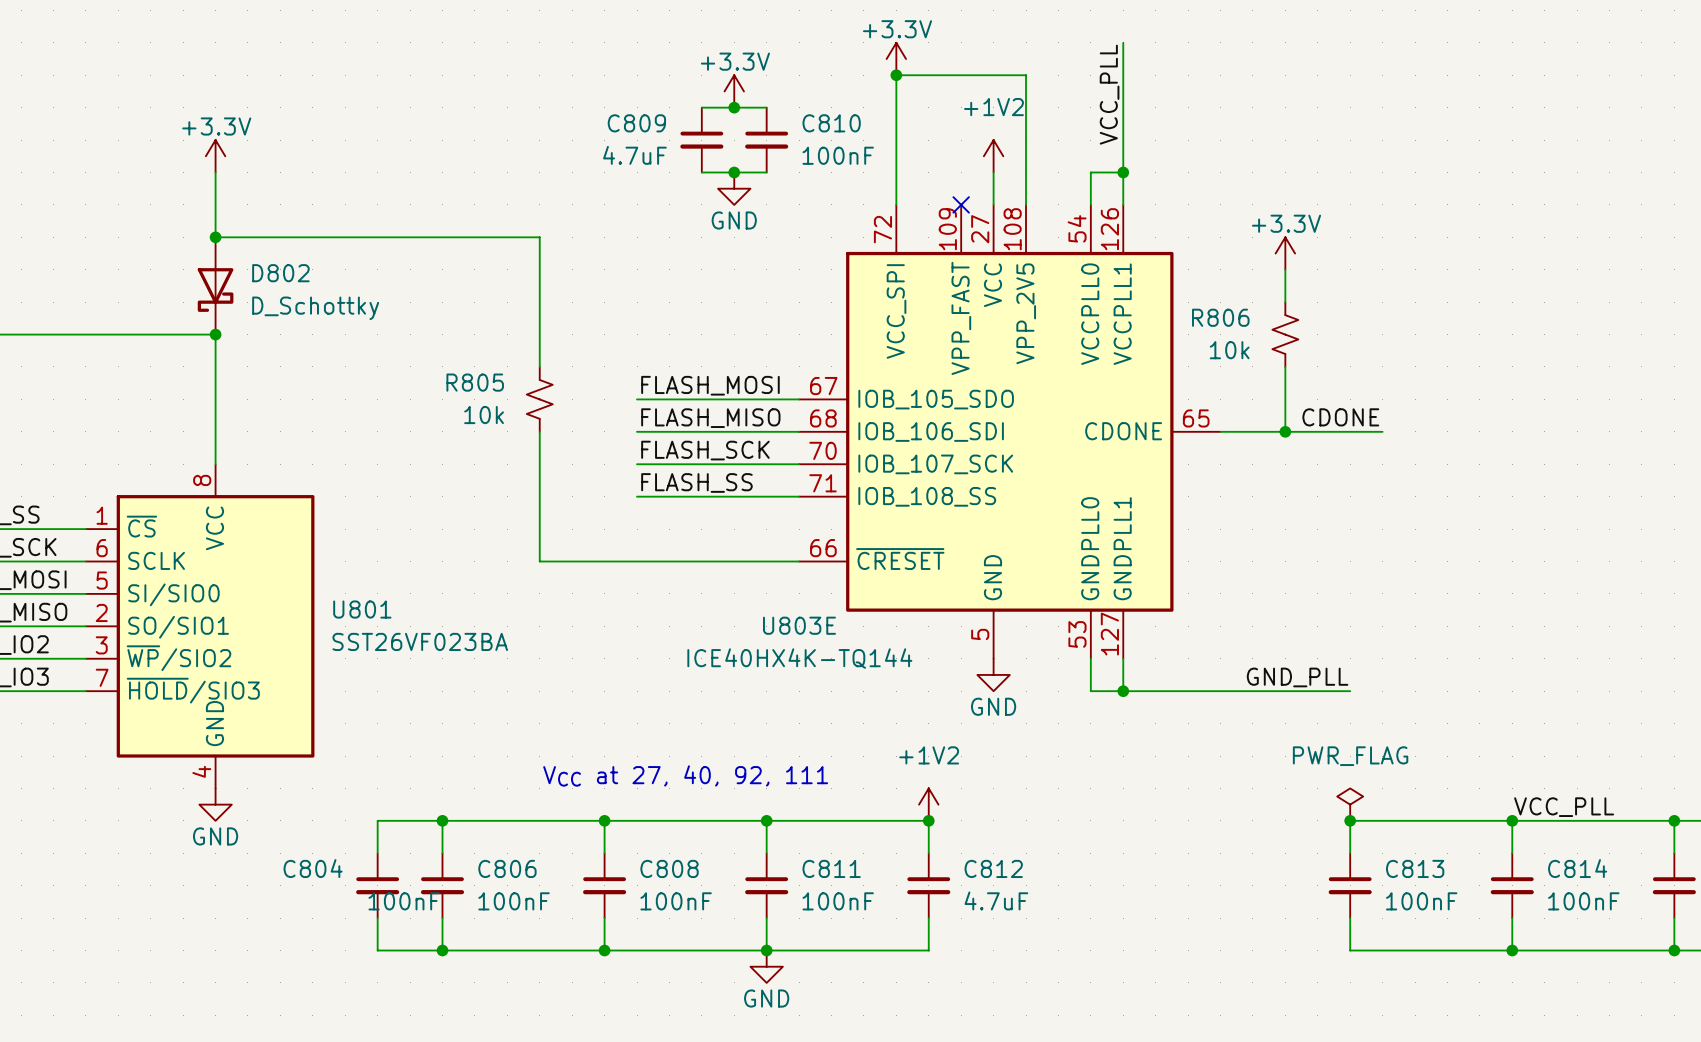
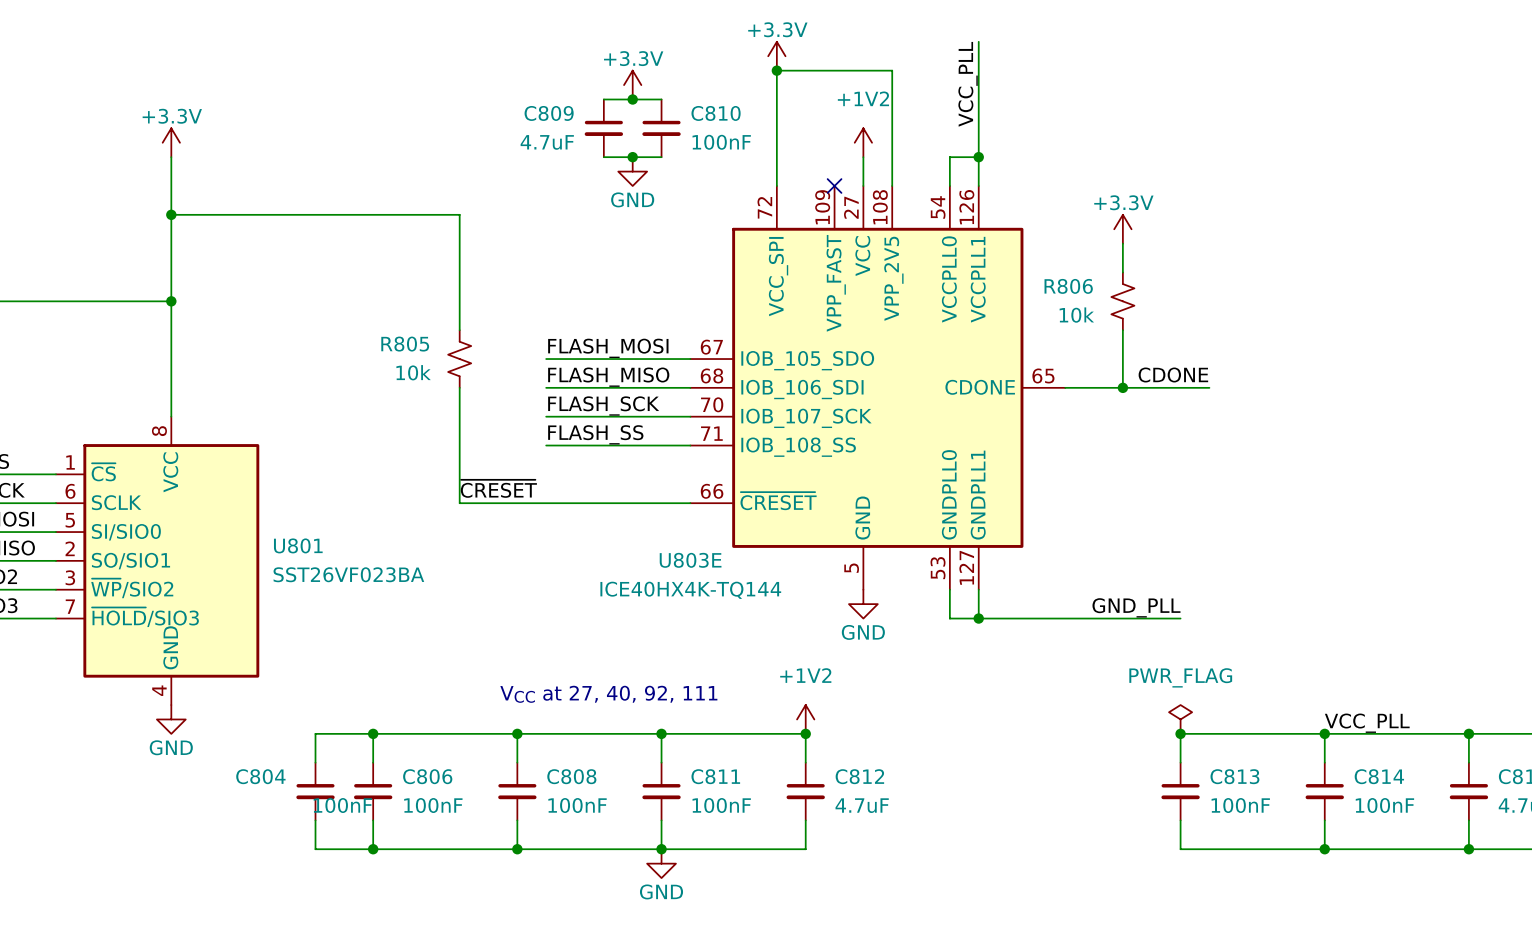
D802: D_Schottky (215, 285) -> none
label: none -> ~{CRESET} (498, 488)

